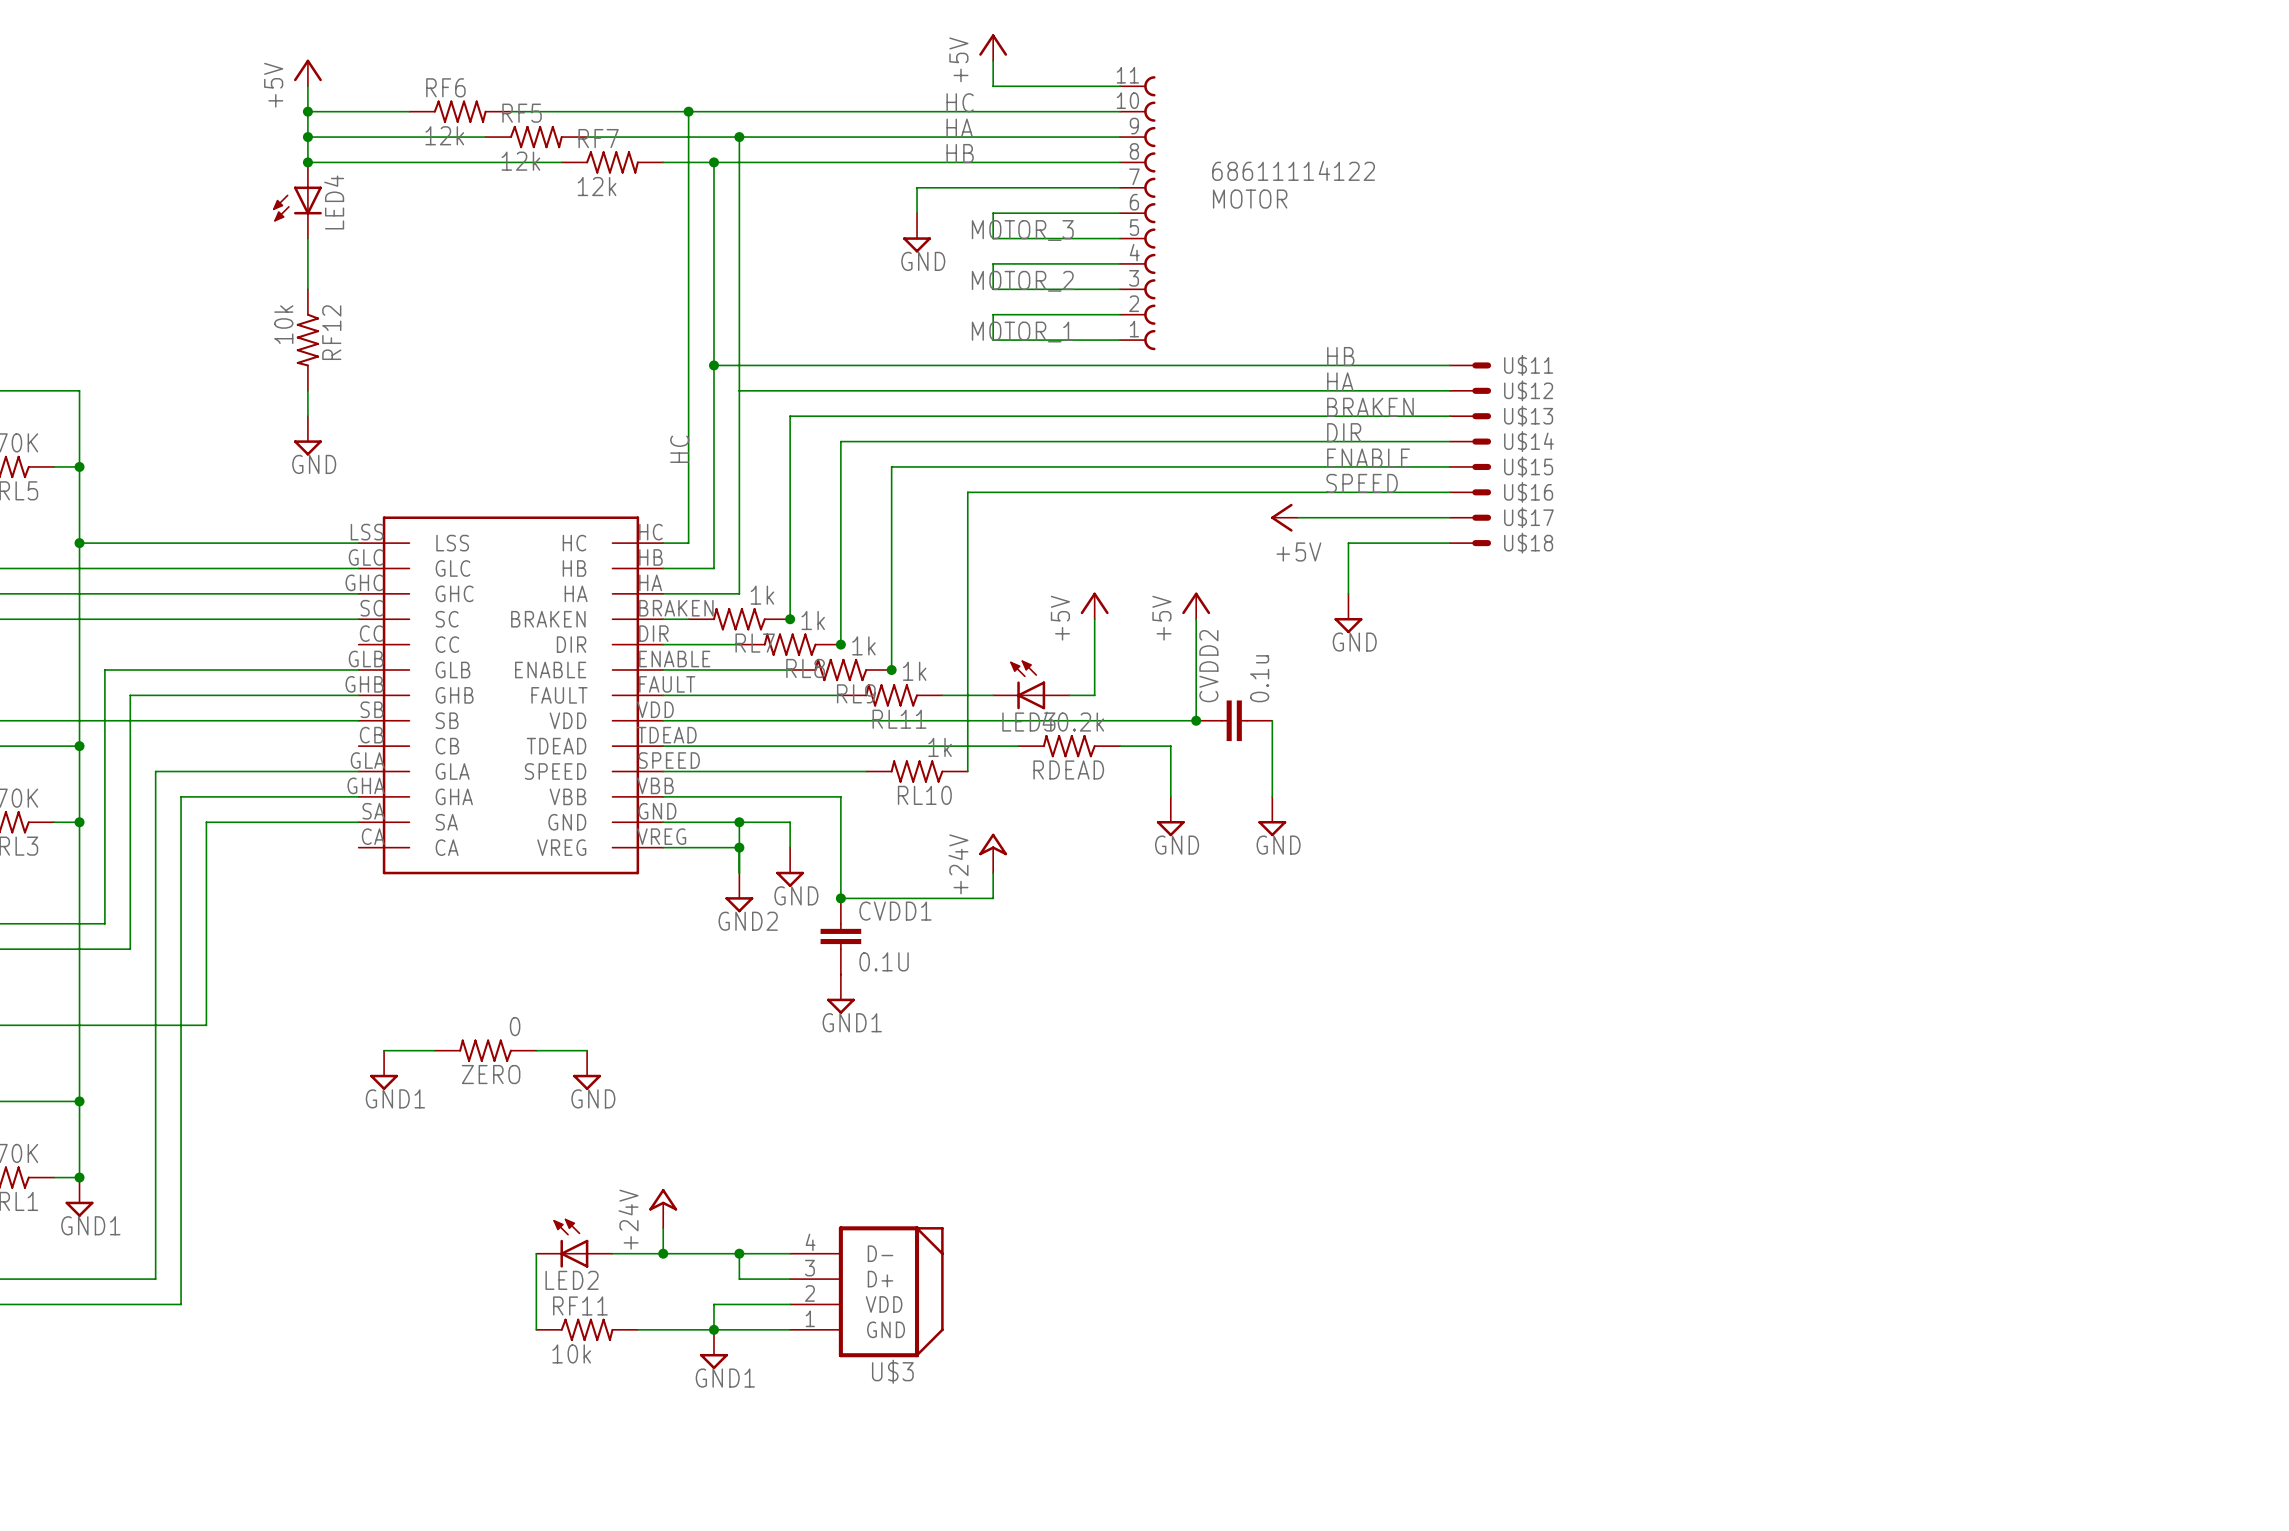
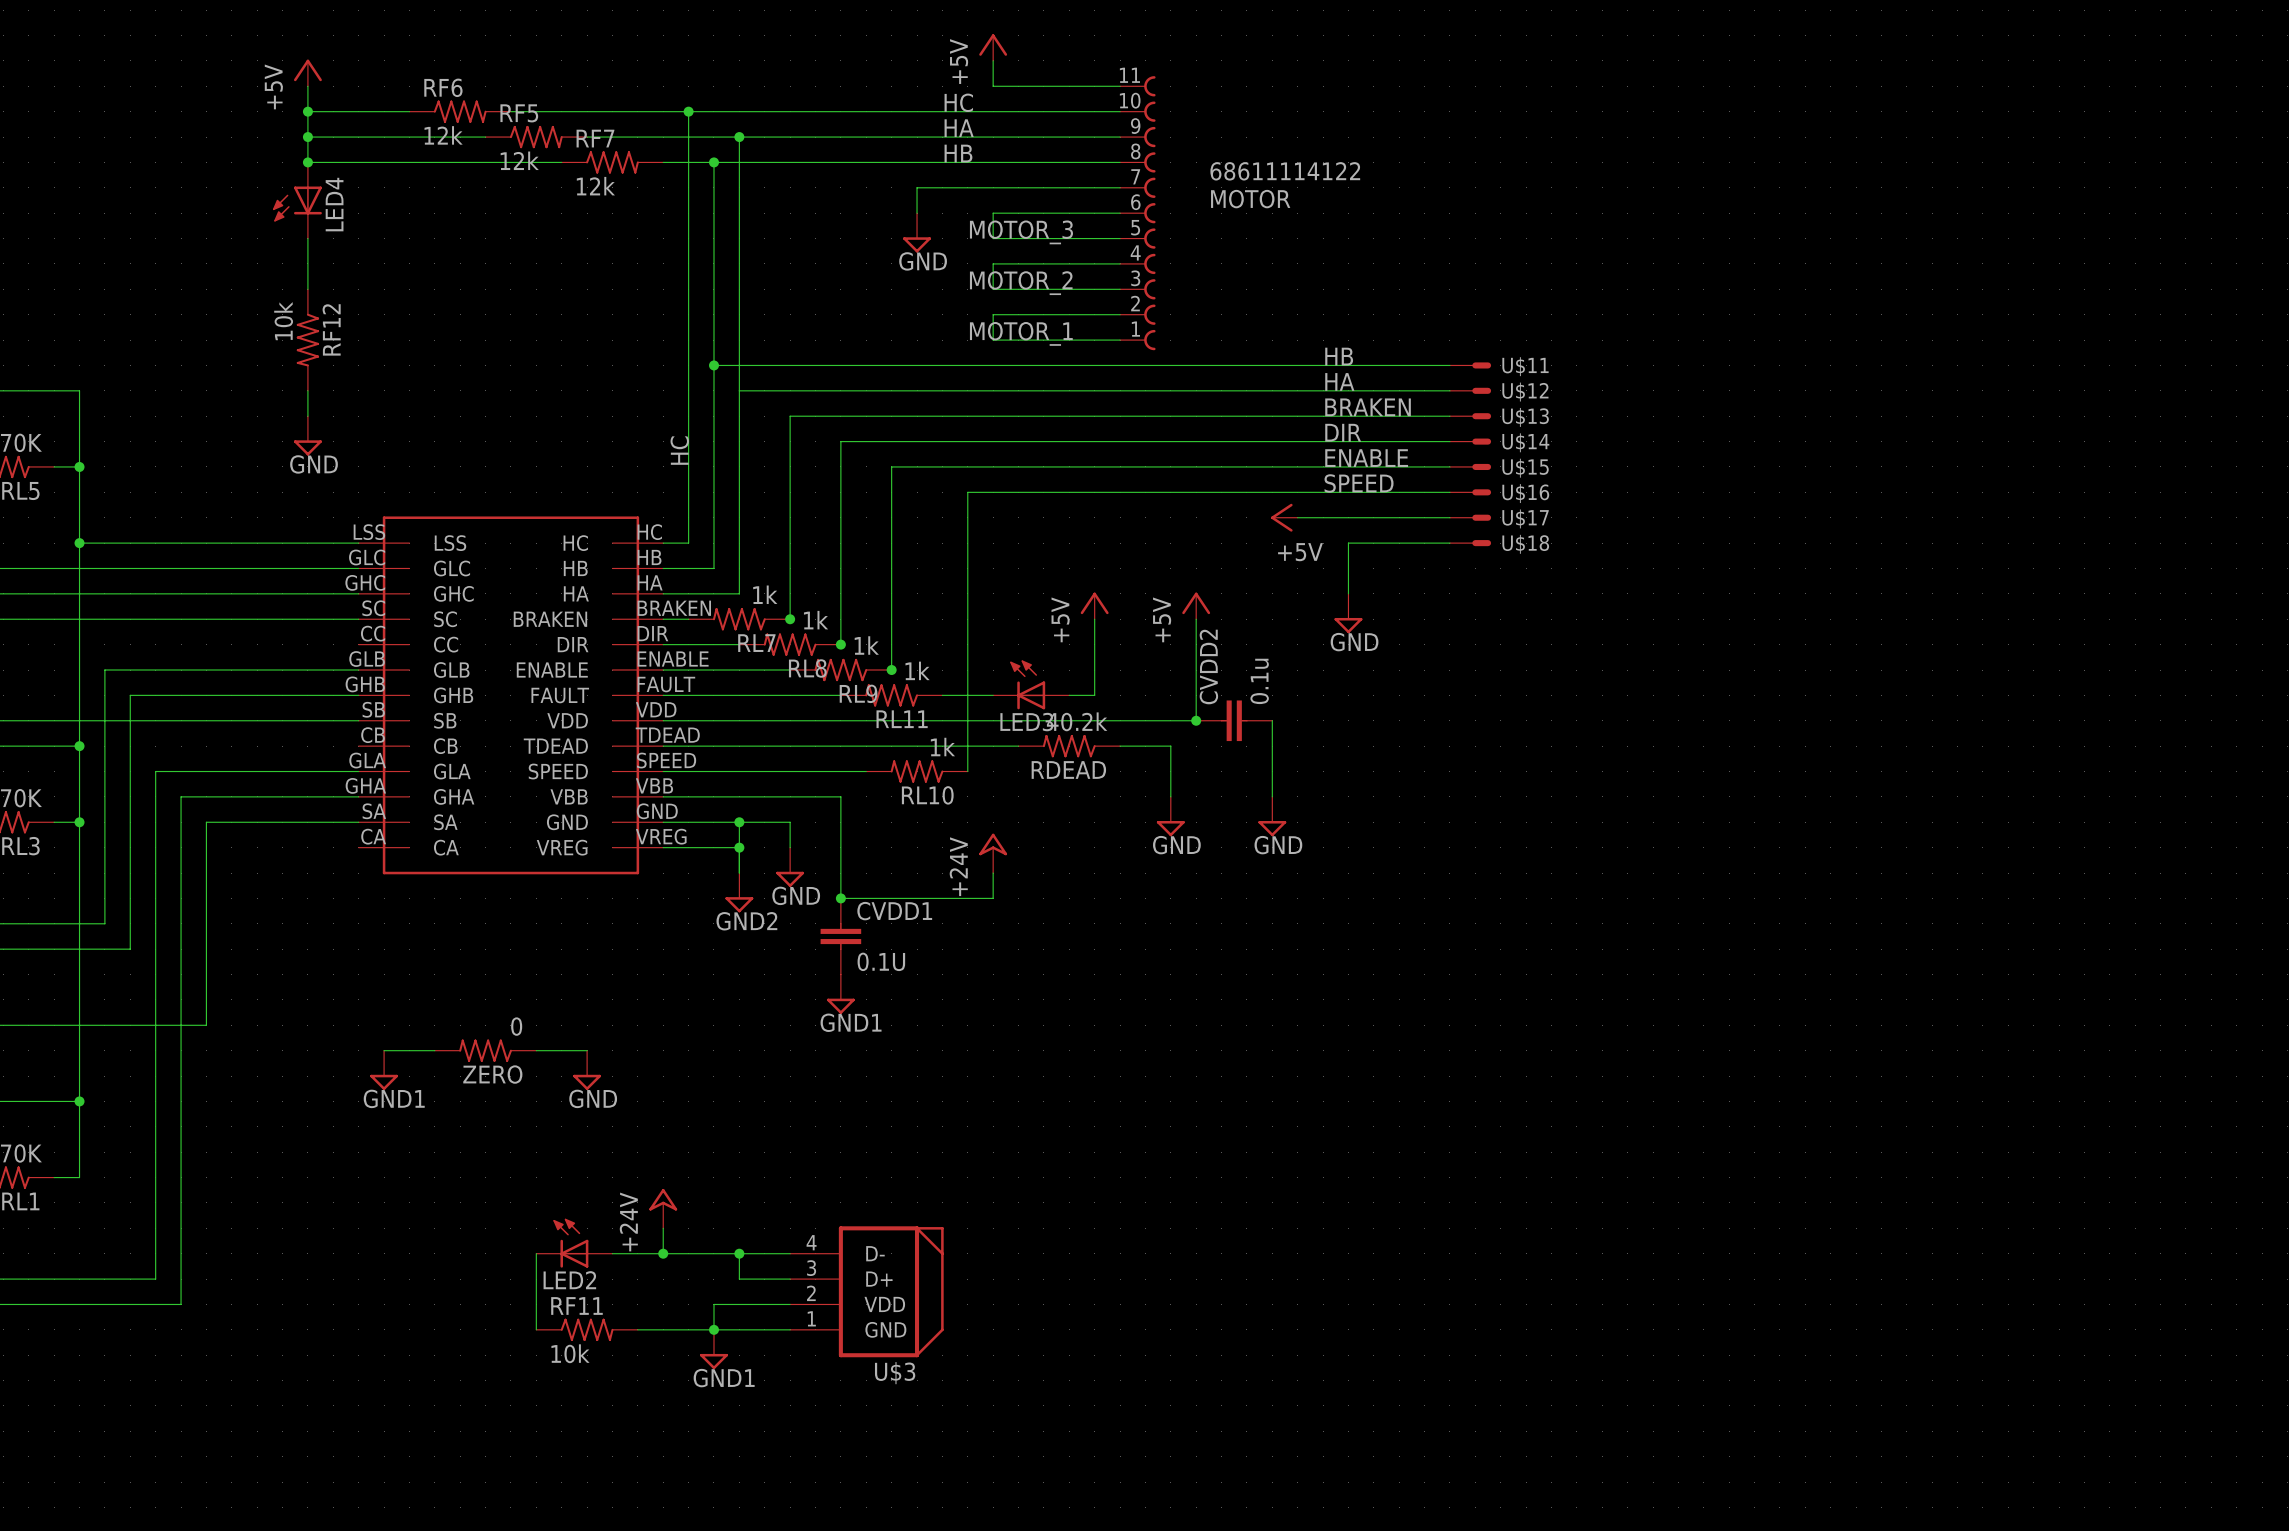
junction: (79, 1177) -> none
power symbol: GND1 (79, 1197) -> none

